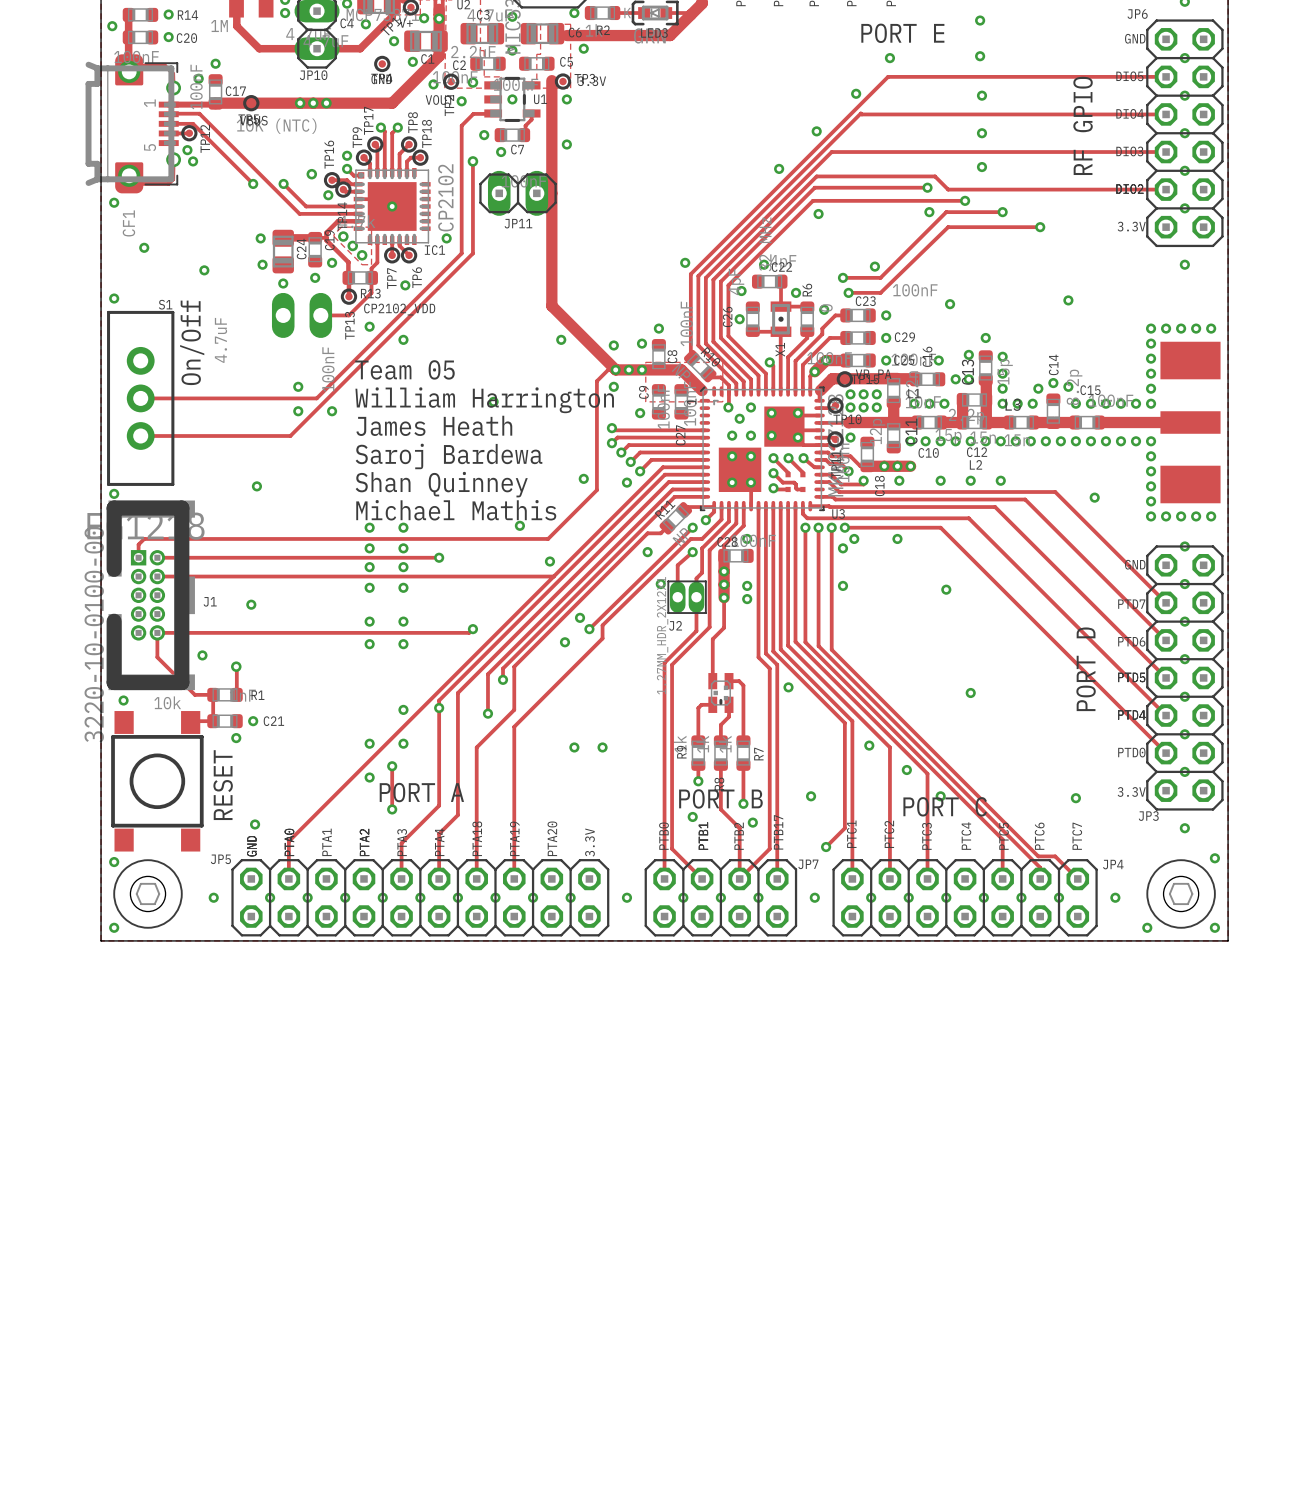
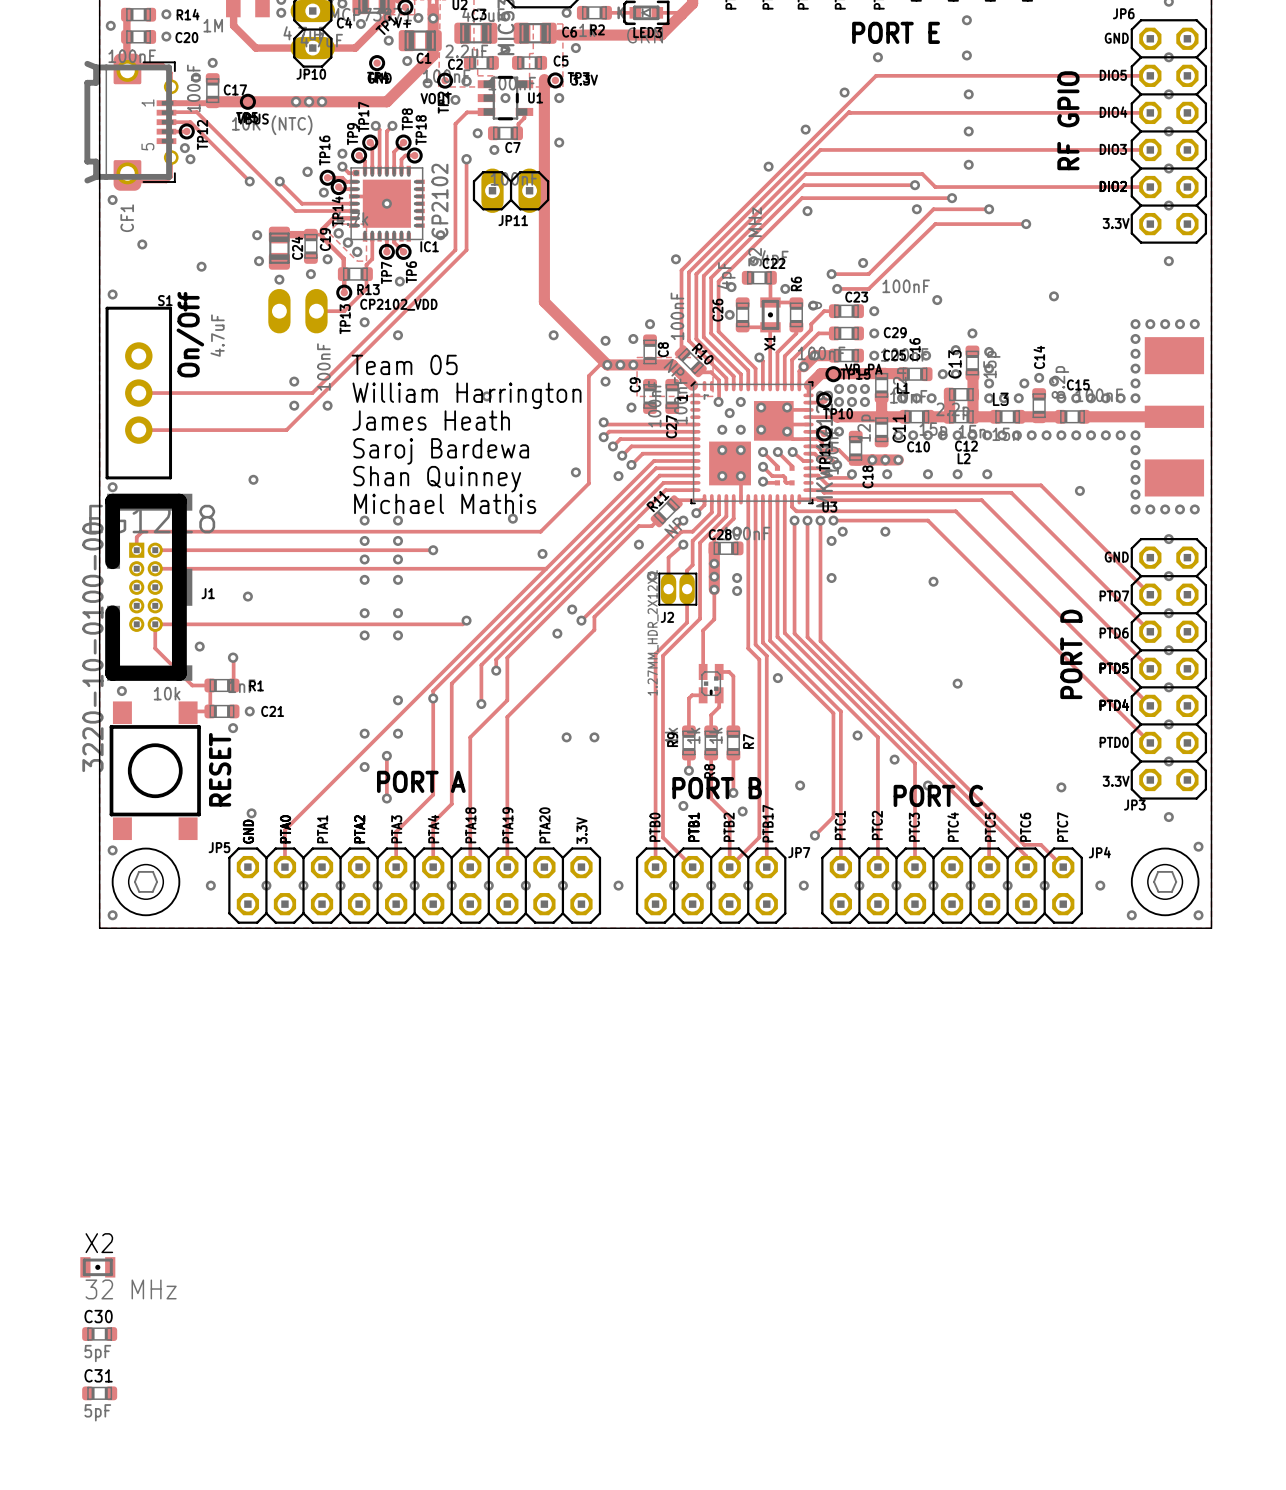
X2: none -> 32 MHz (97, 1267)
C30: none -> 5pF (99, 1334)
C31: none -> 5pF (99, 1393)

